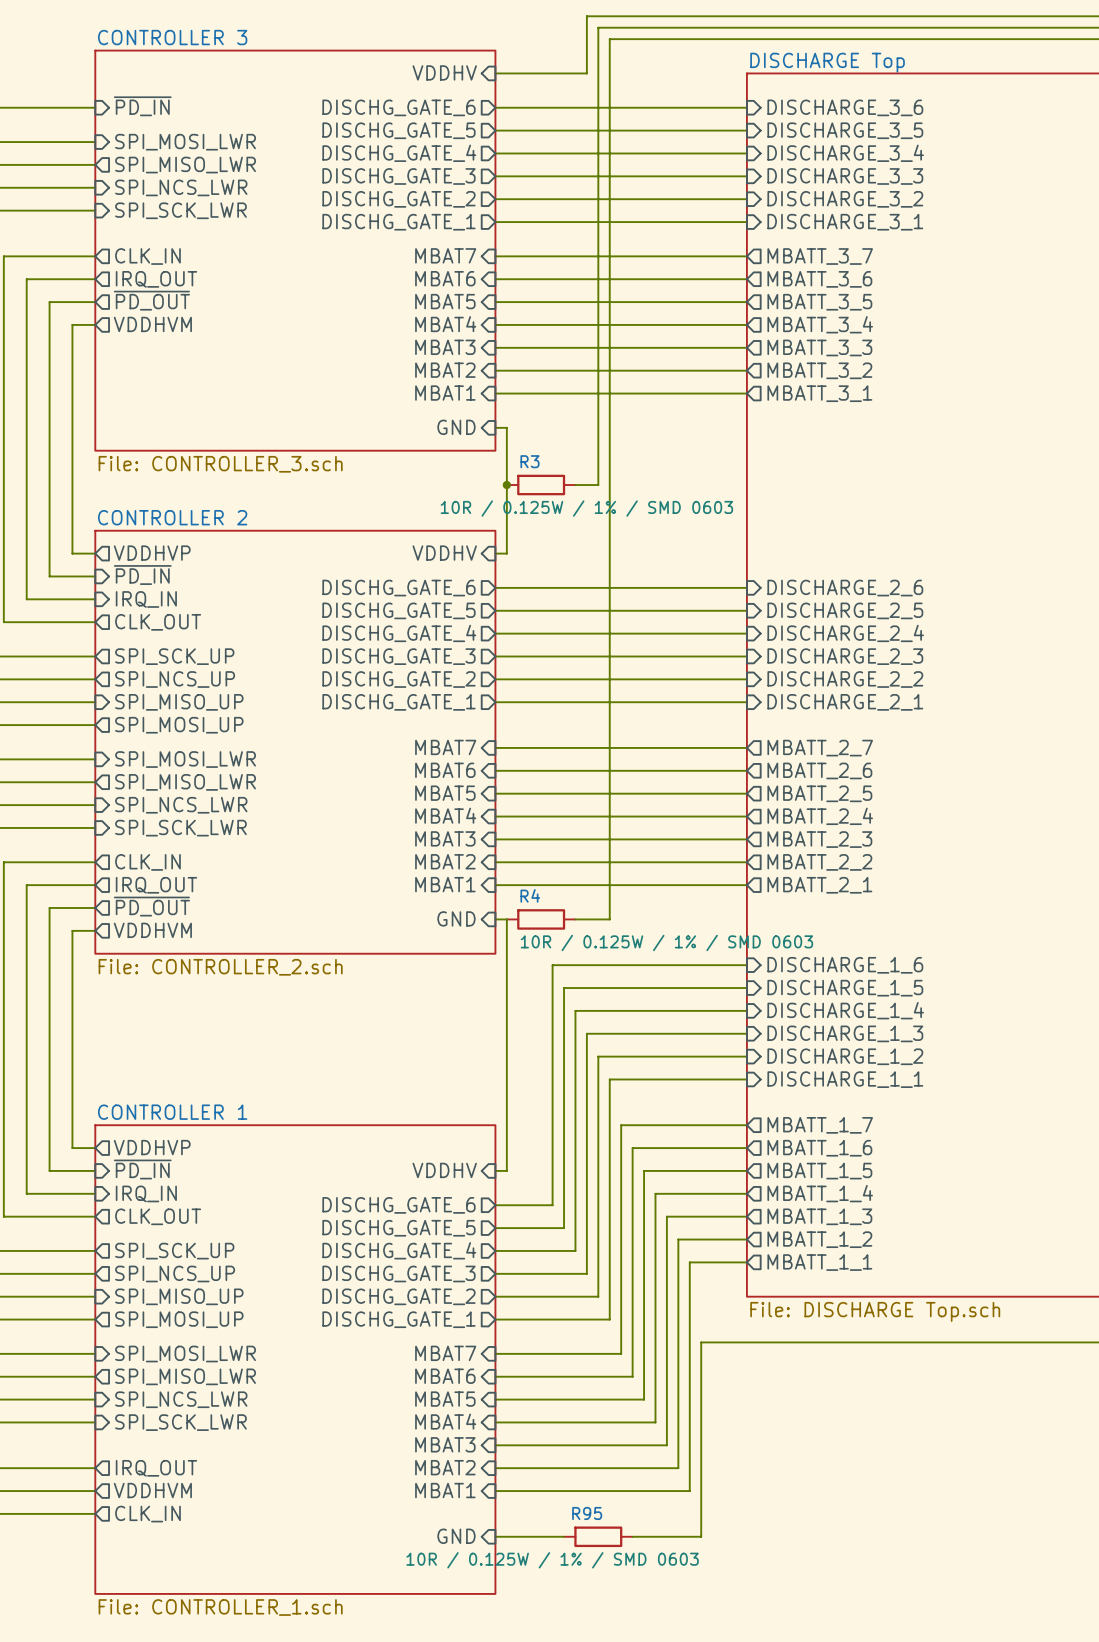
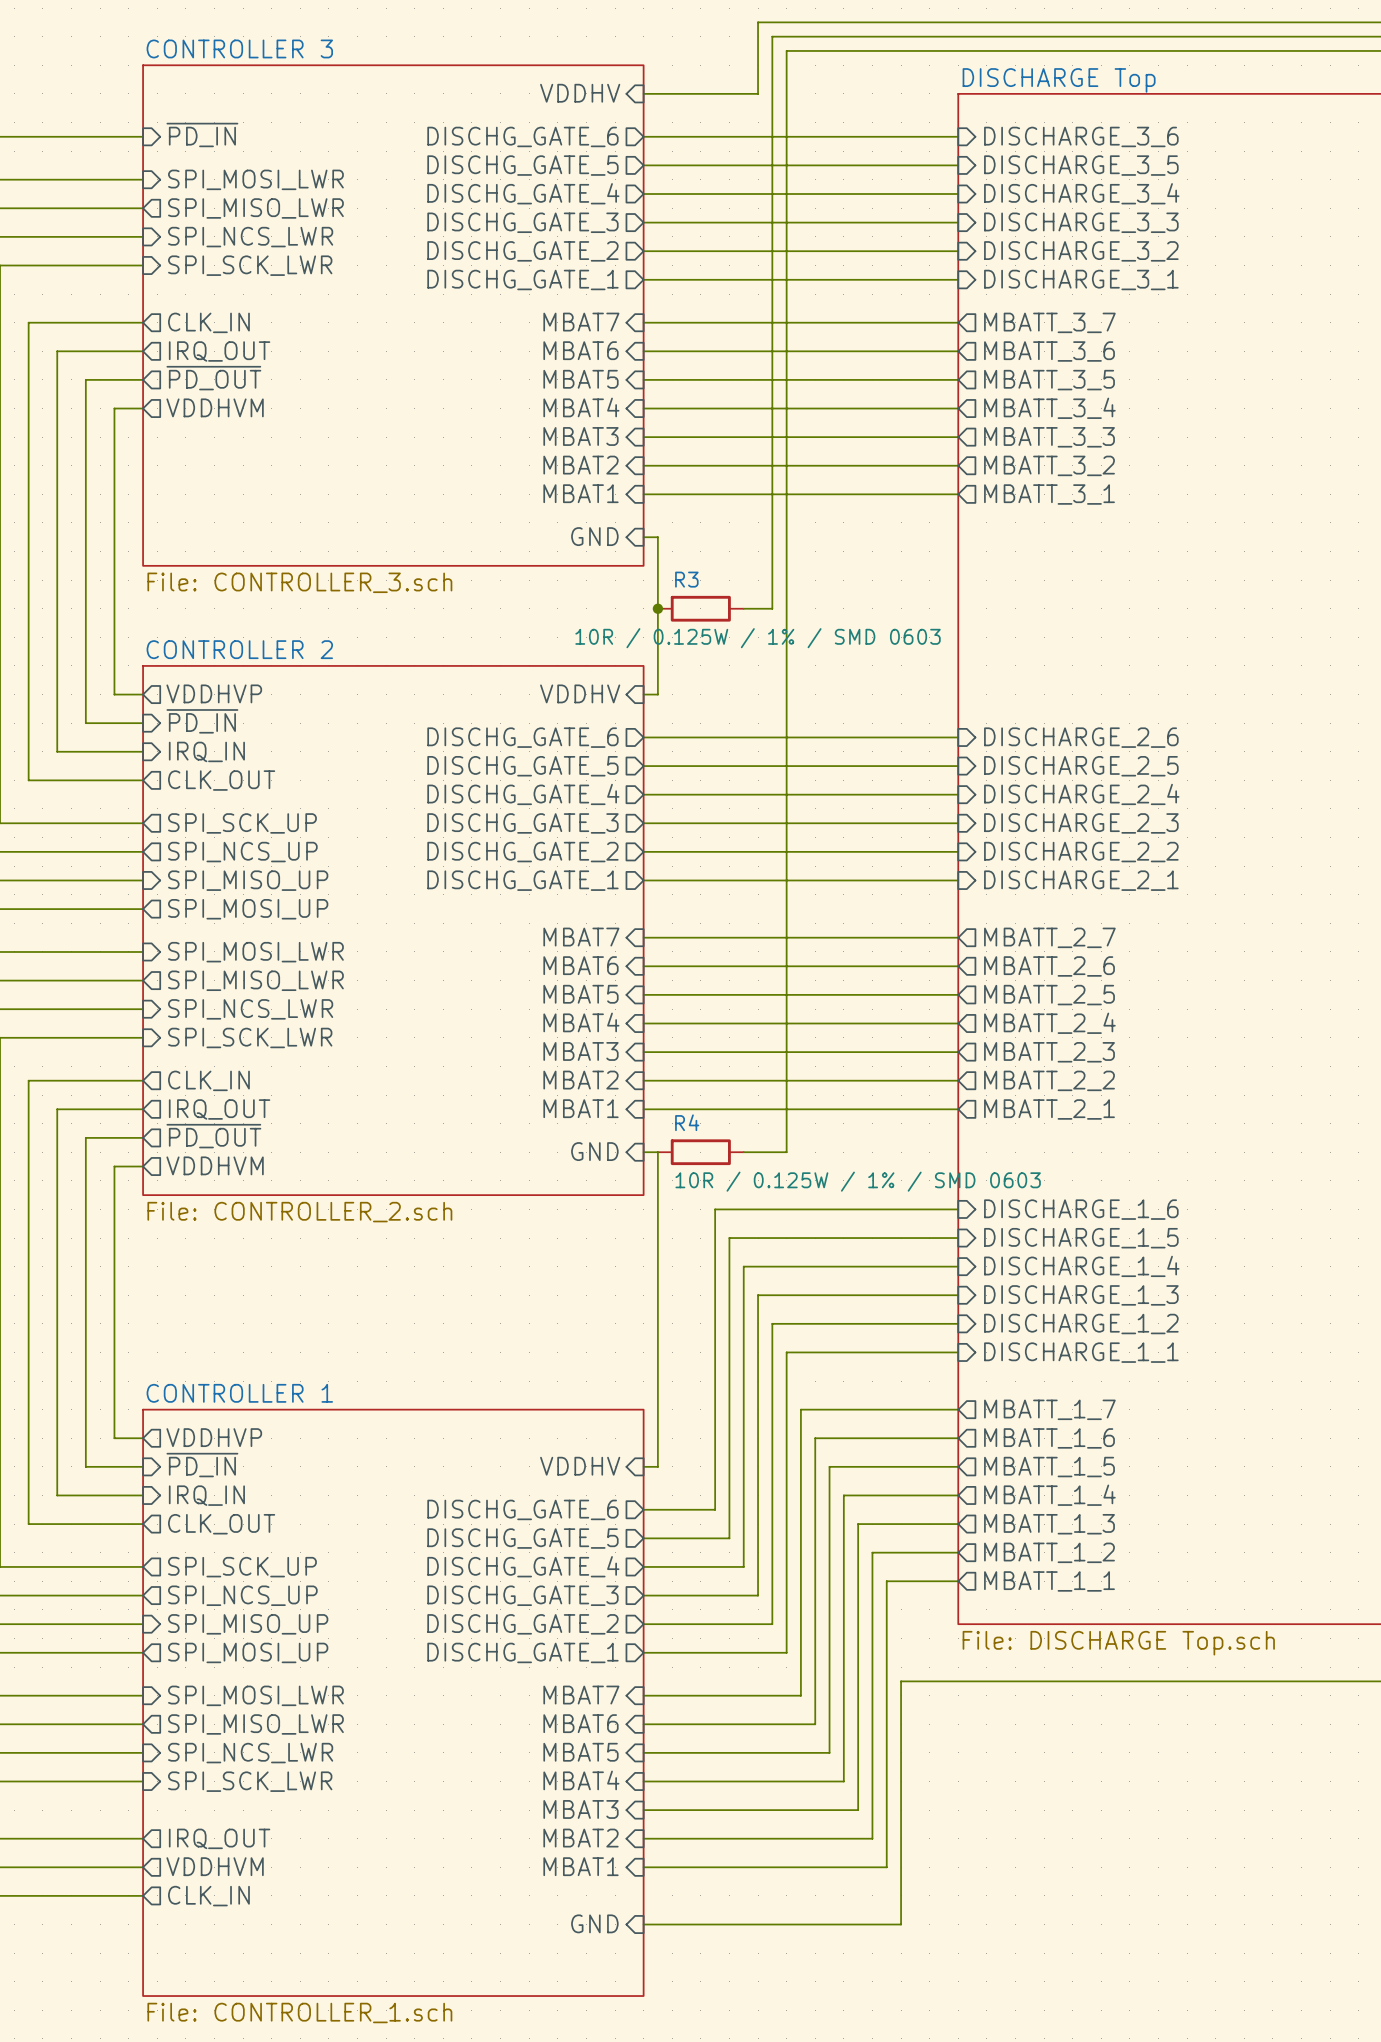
wire: none -> (729, 1924) (815, 1924)
R95: 10R / 0.125W / 1% / SMD 0603 (598, 1536) -> none

